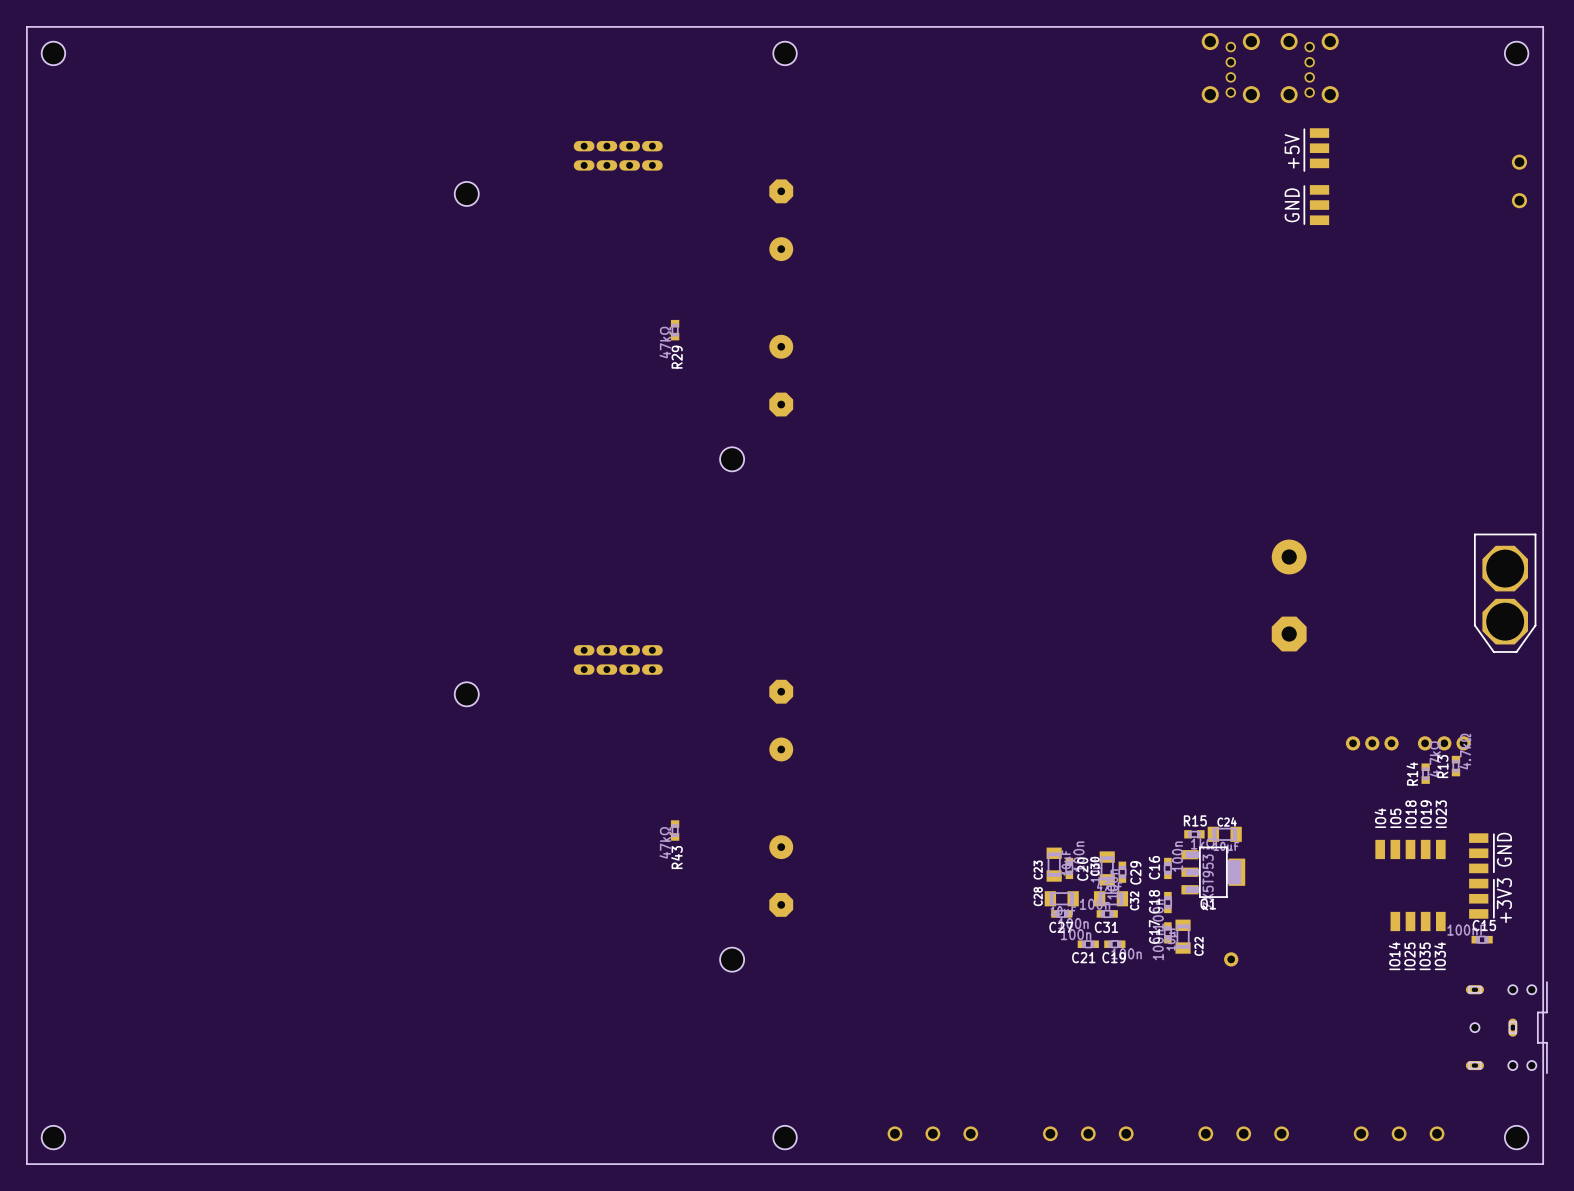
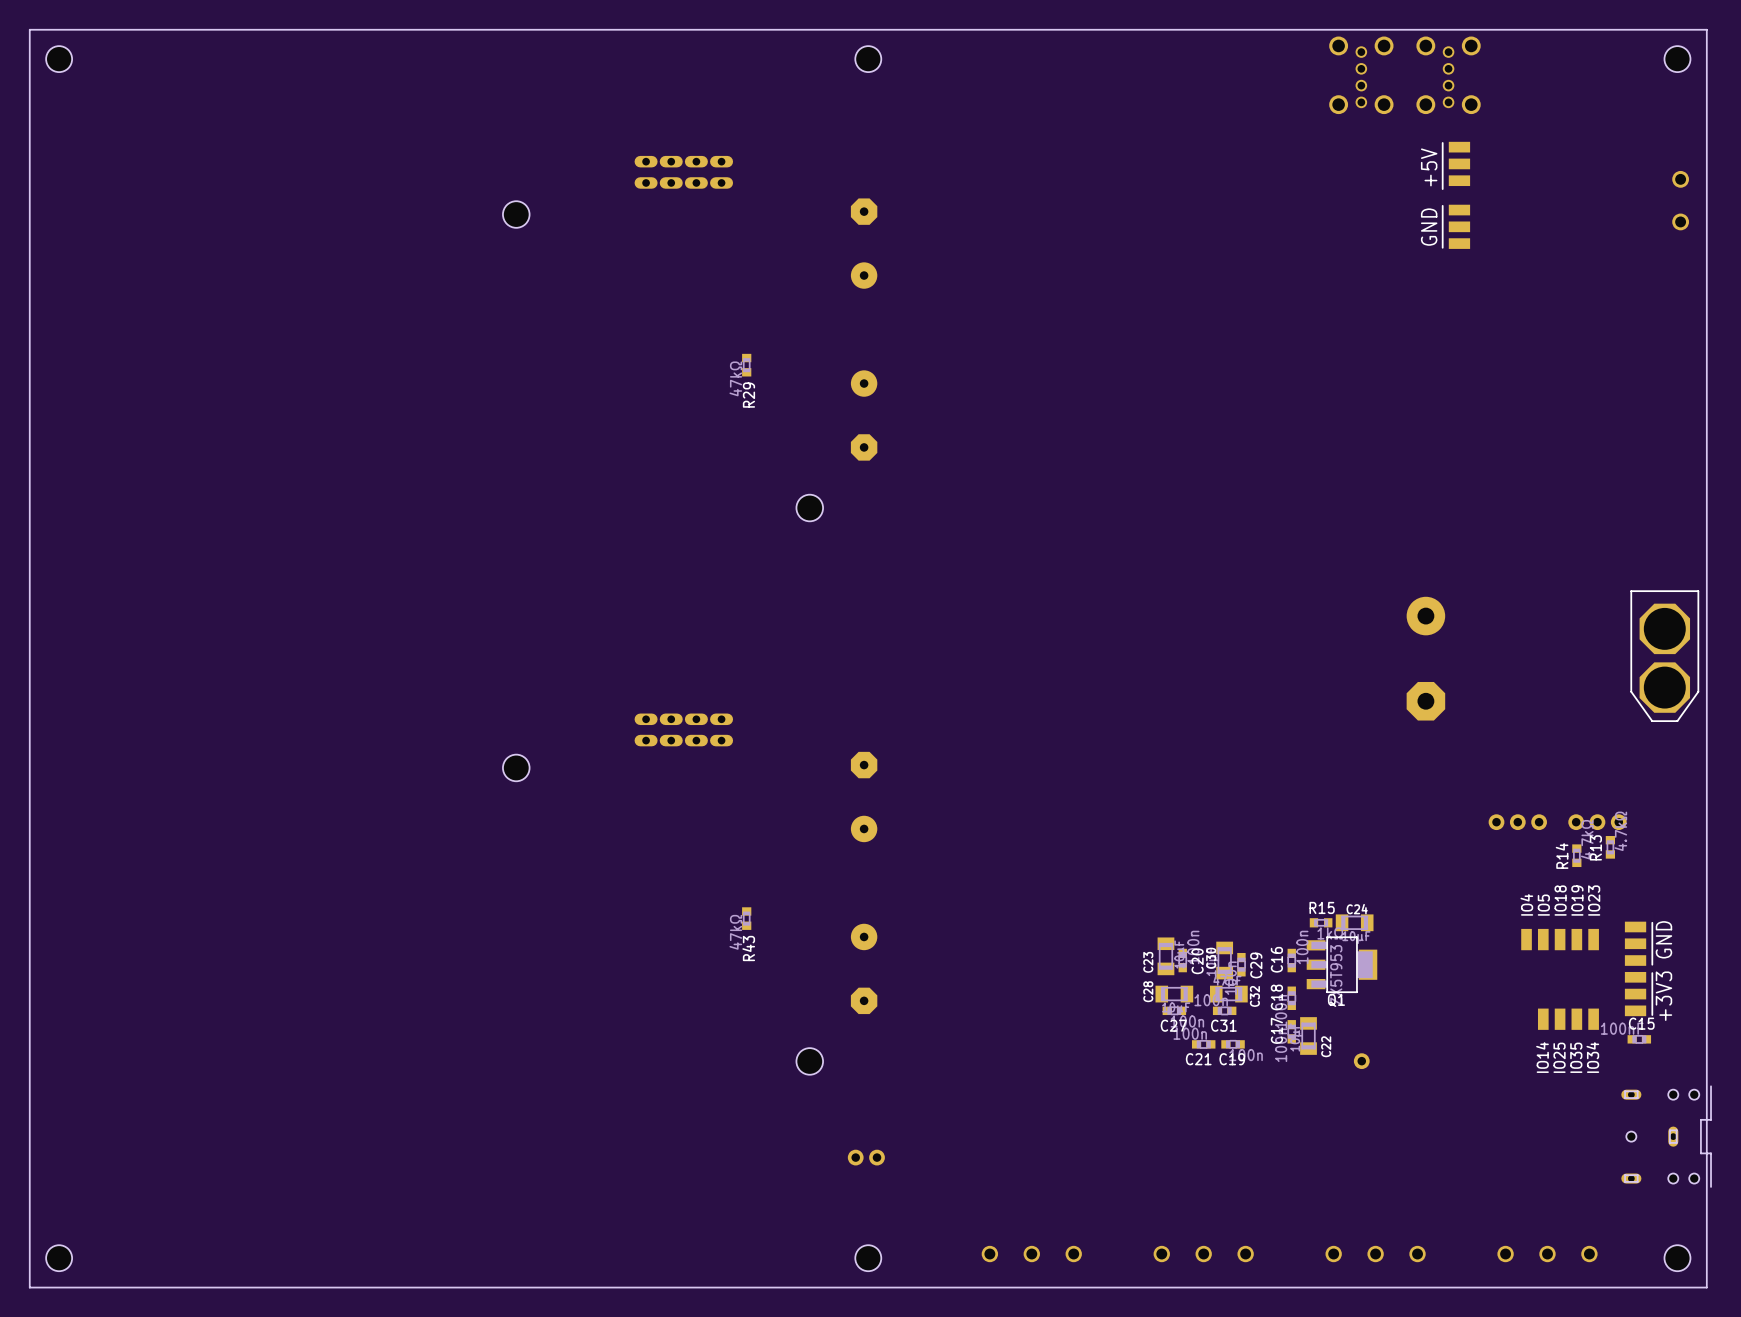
part: none -> (866, 1157)

